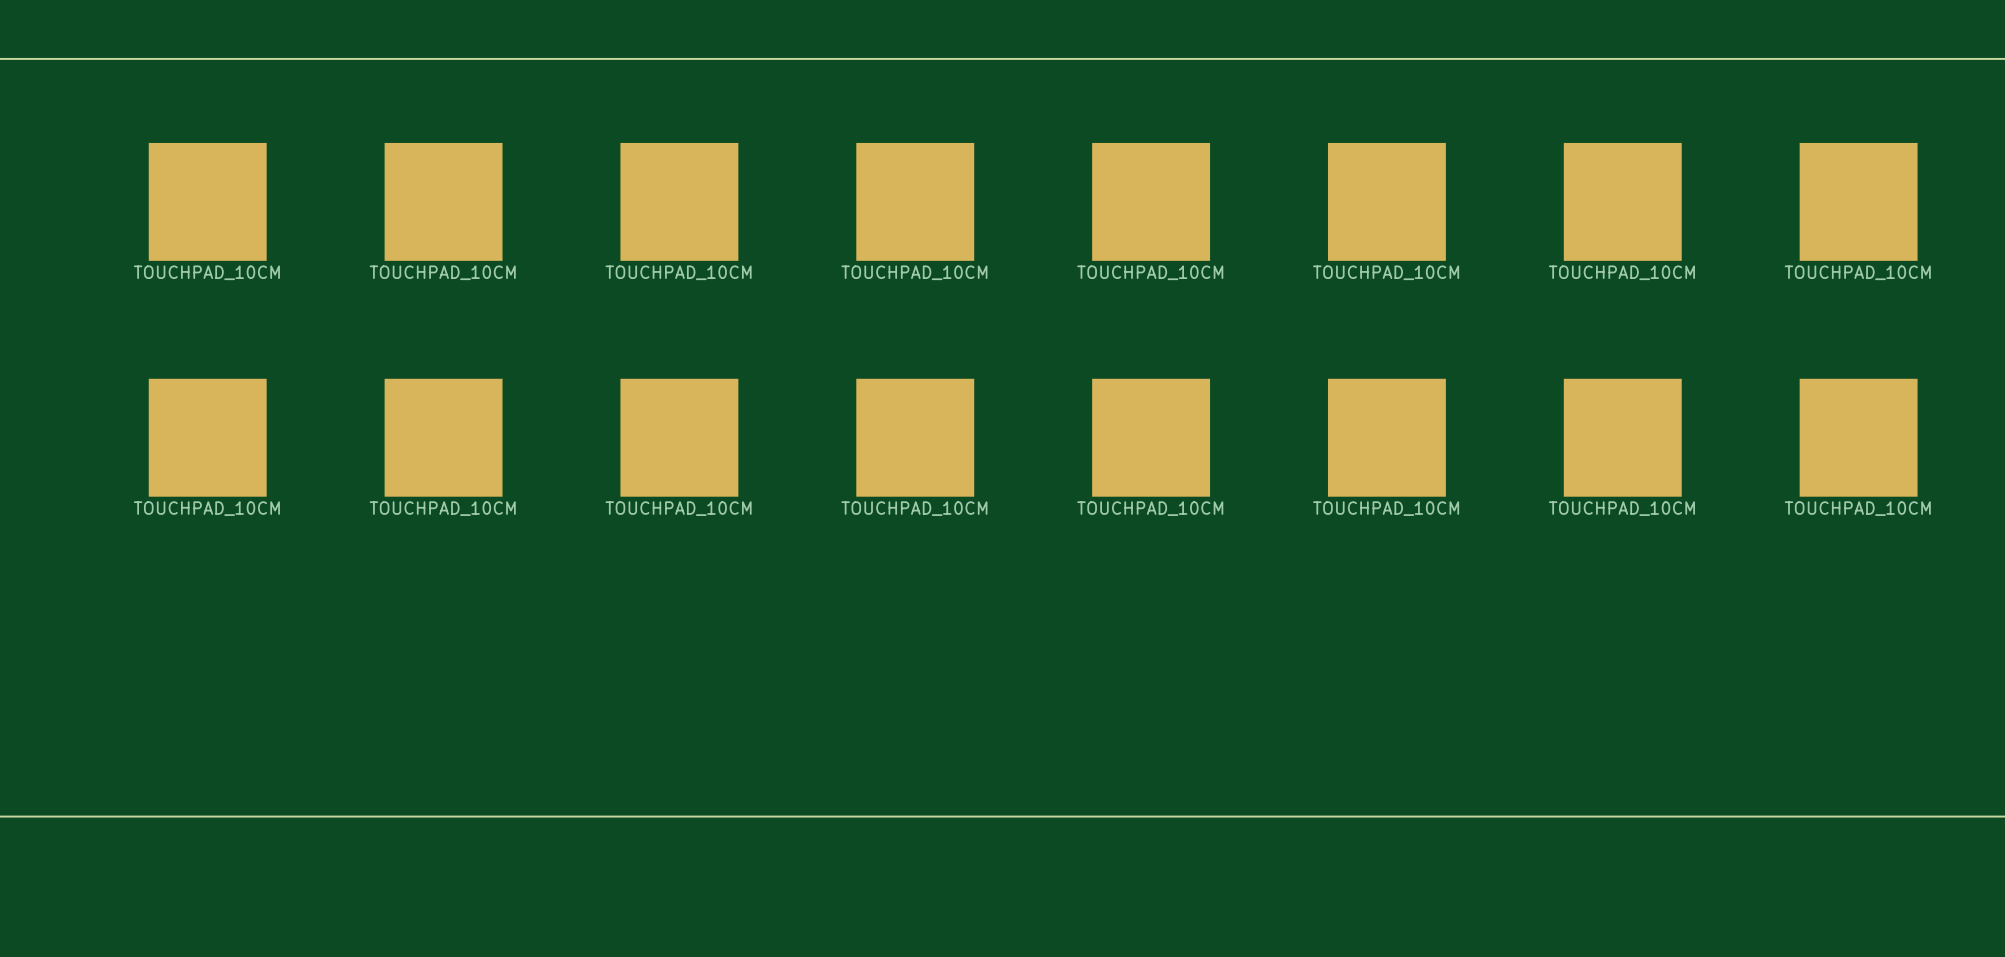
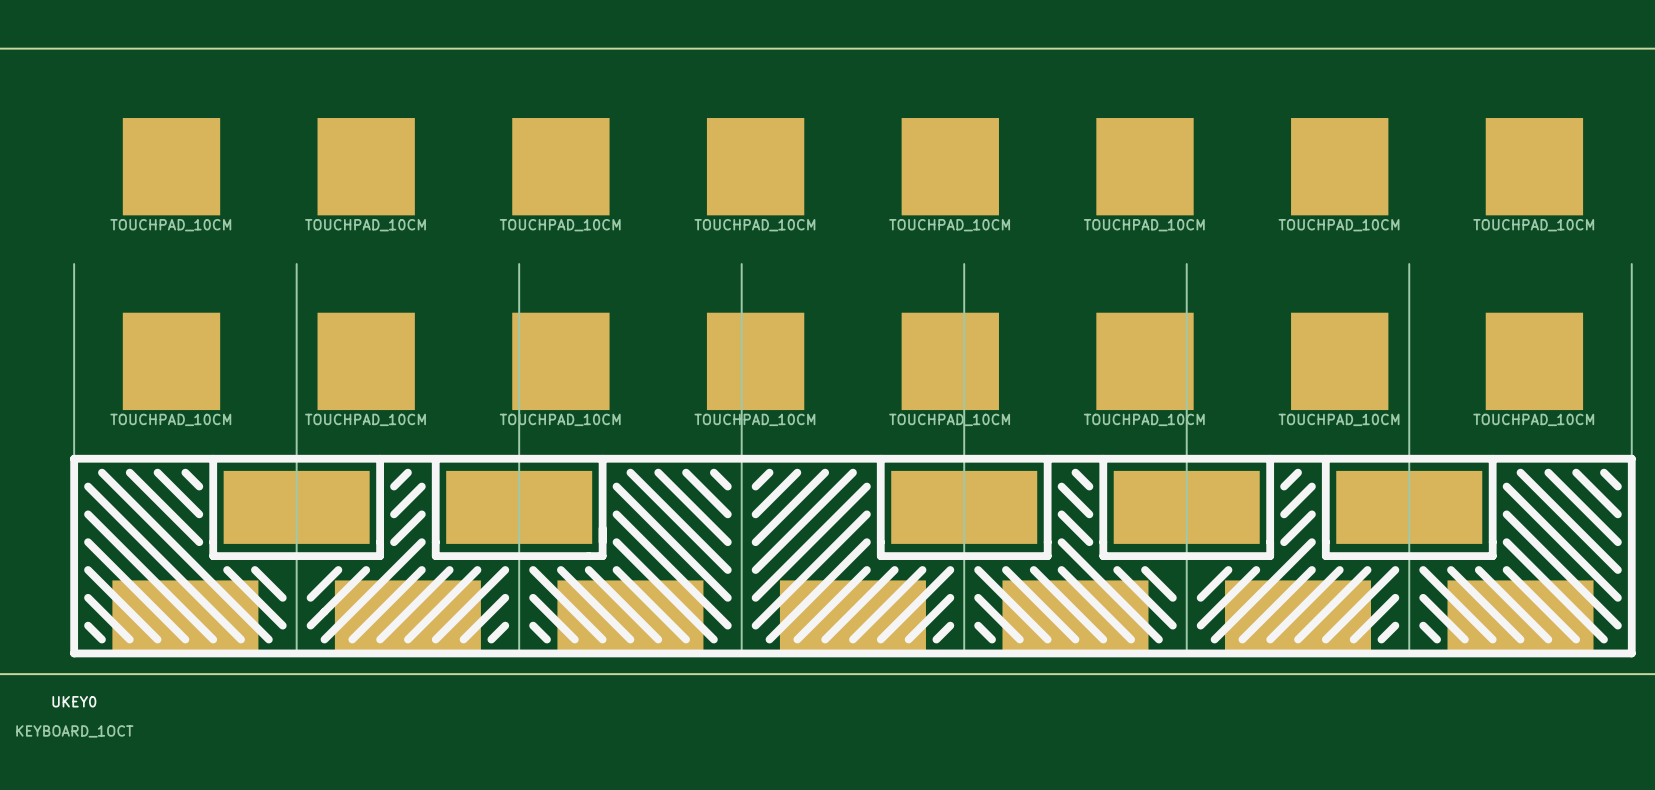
UKEY0: none -> KEYBOARD_1OCT (852, 460)

